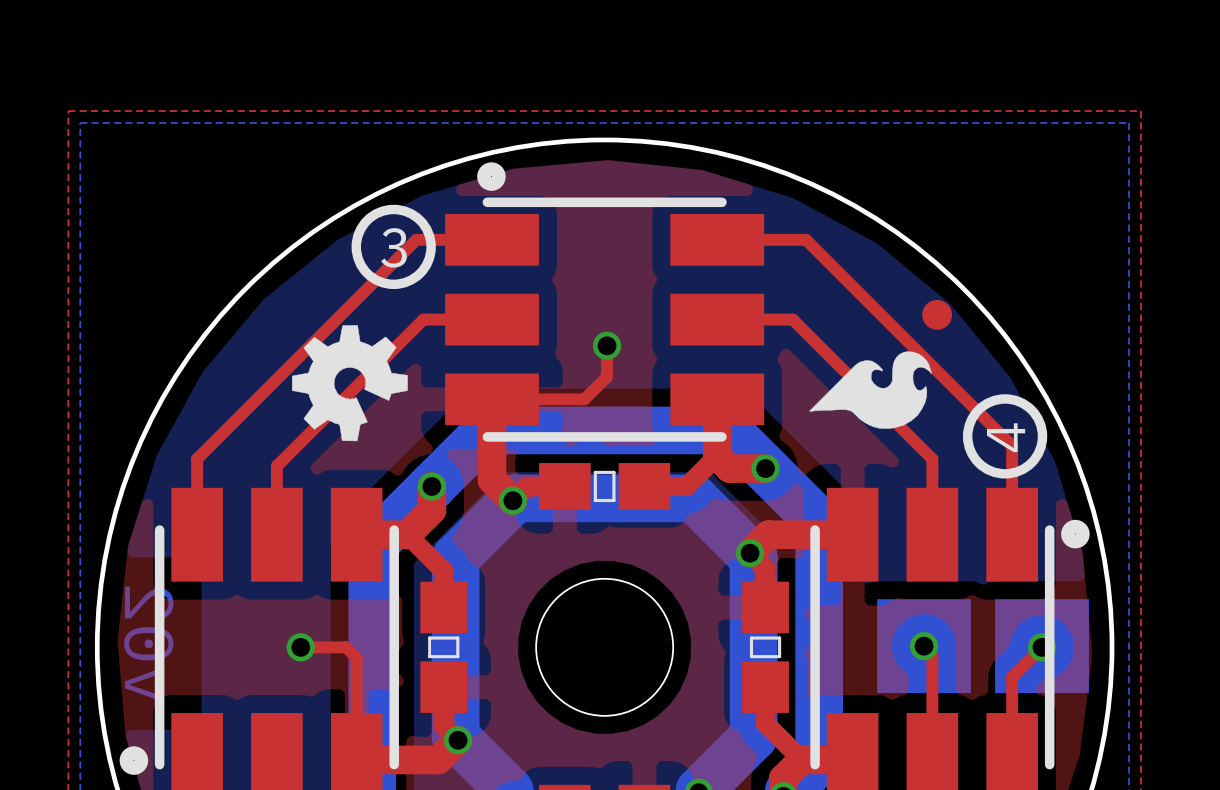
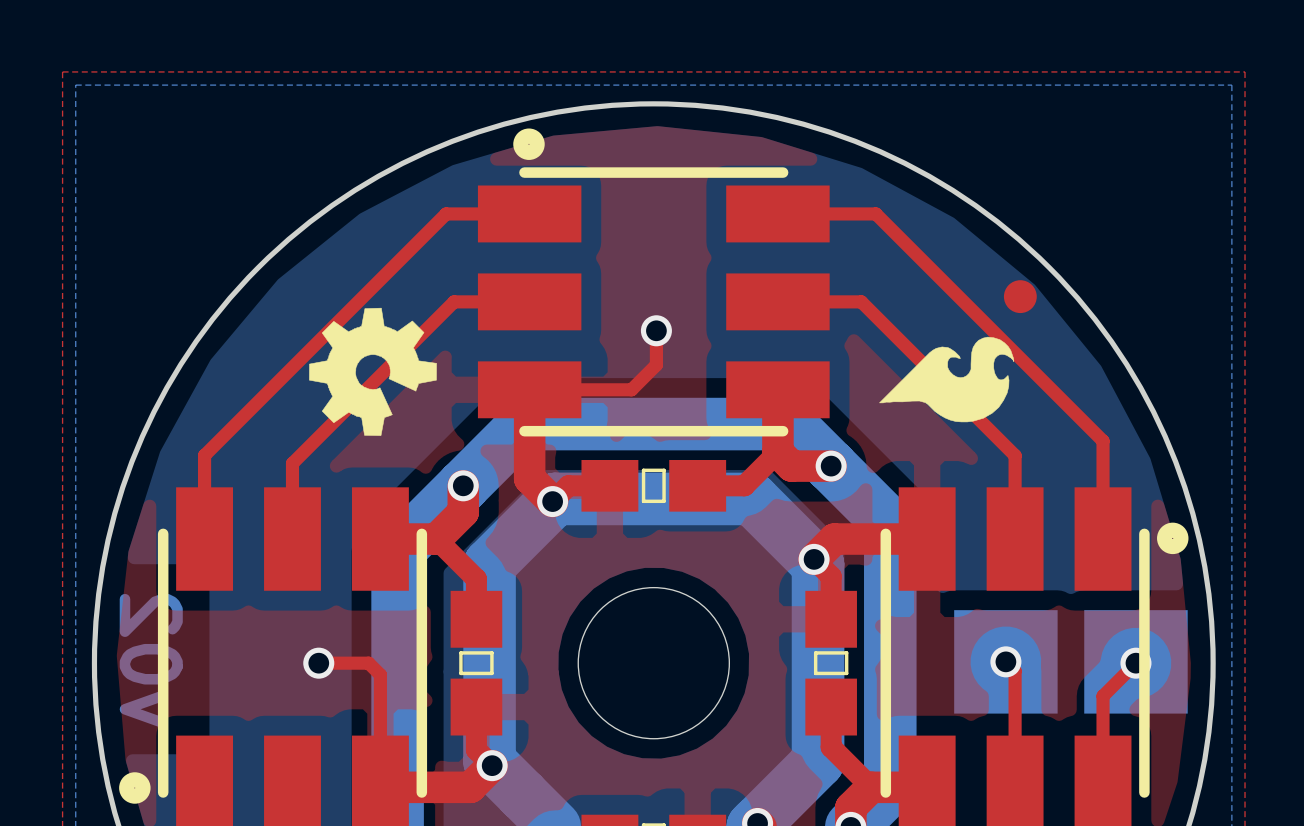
drawing: [351, 204, 436, 290] -> none
text: 3 (393, 247) -> none
drawing: [962, 394, 1048, 479] -> none
text: 4 (1006, 437) -> none

